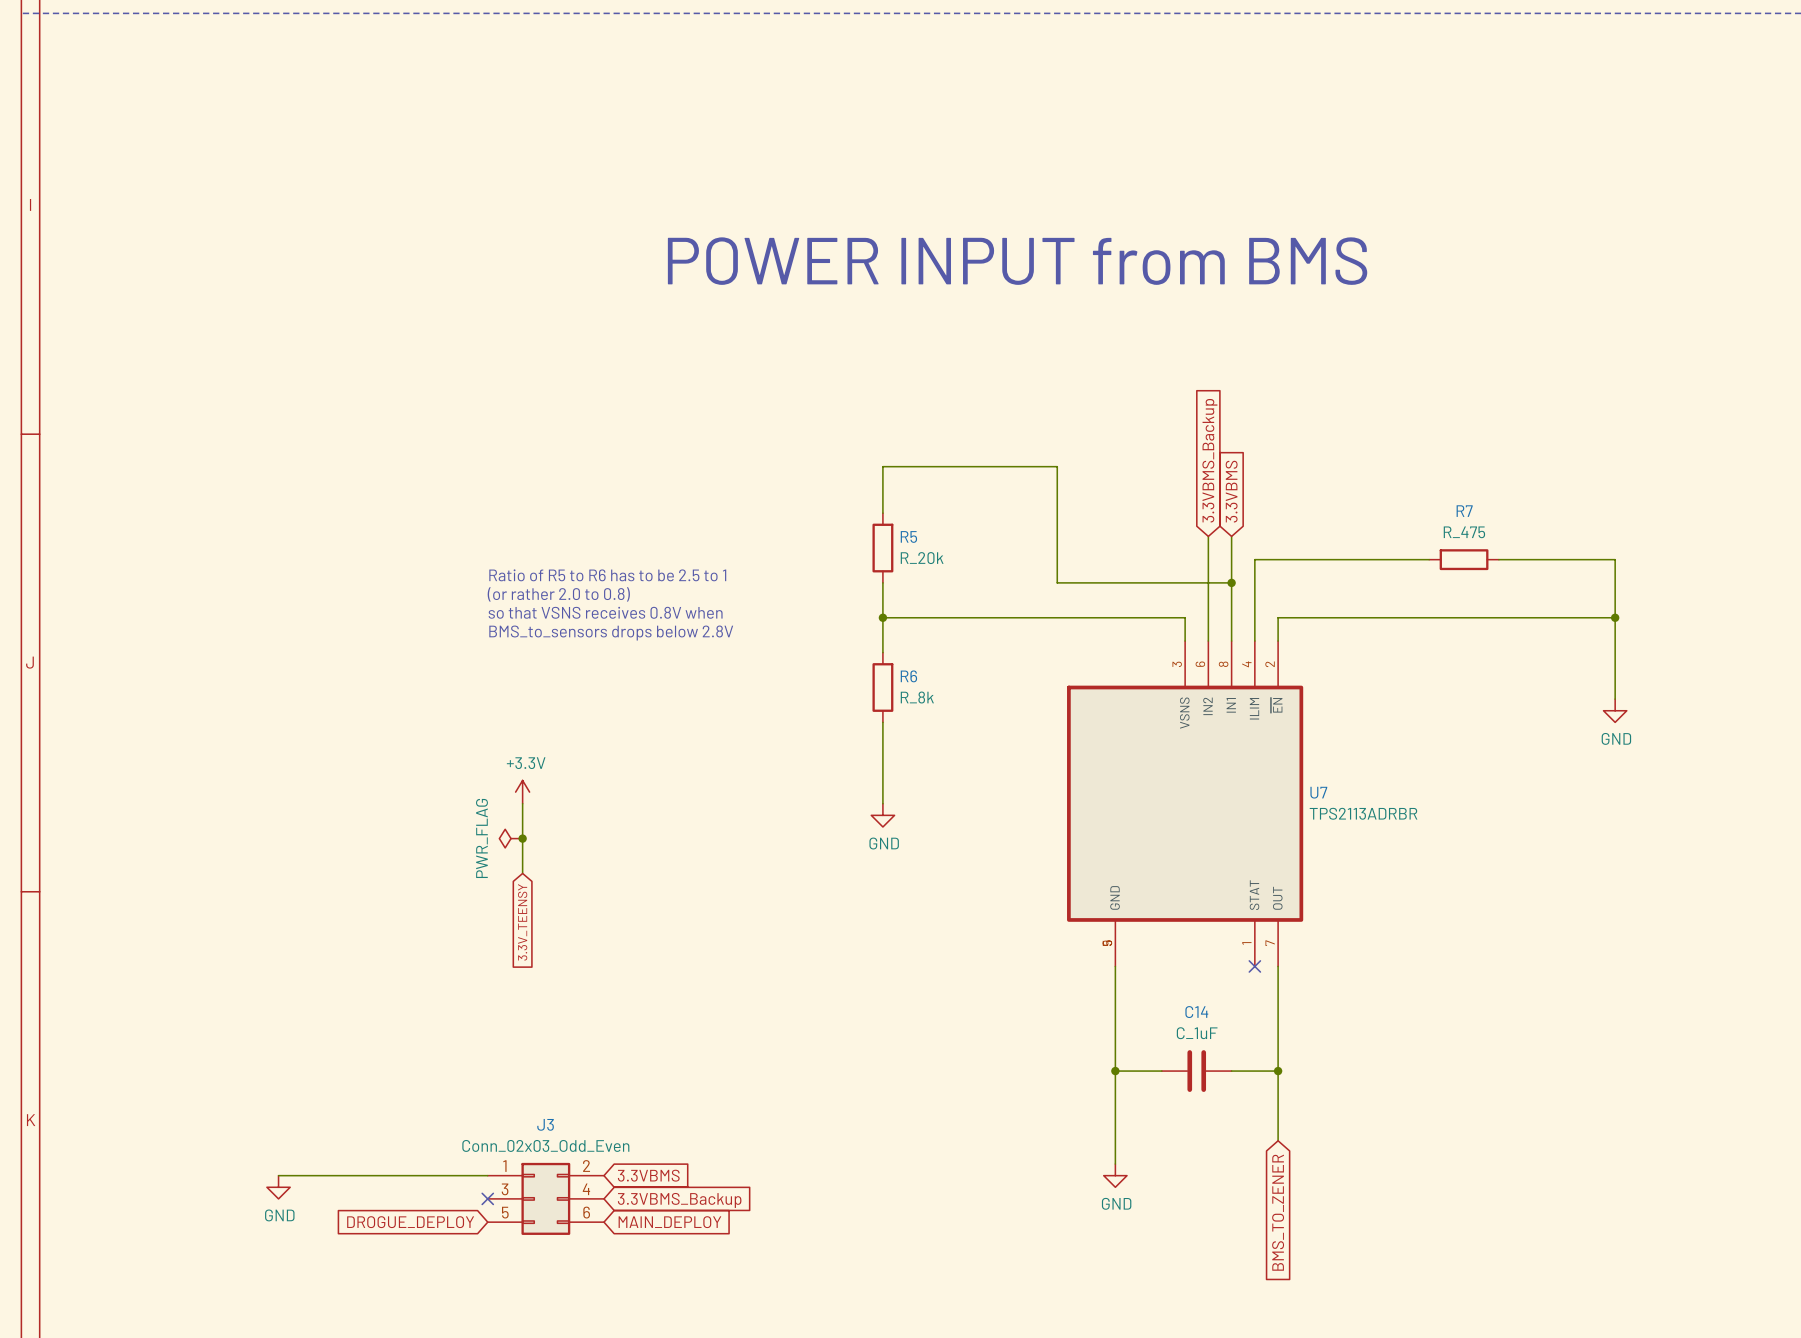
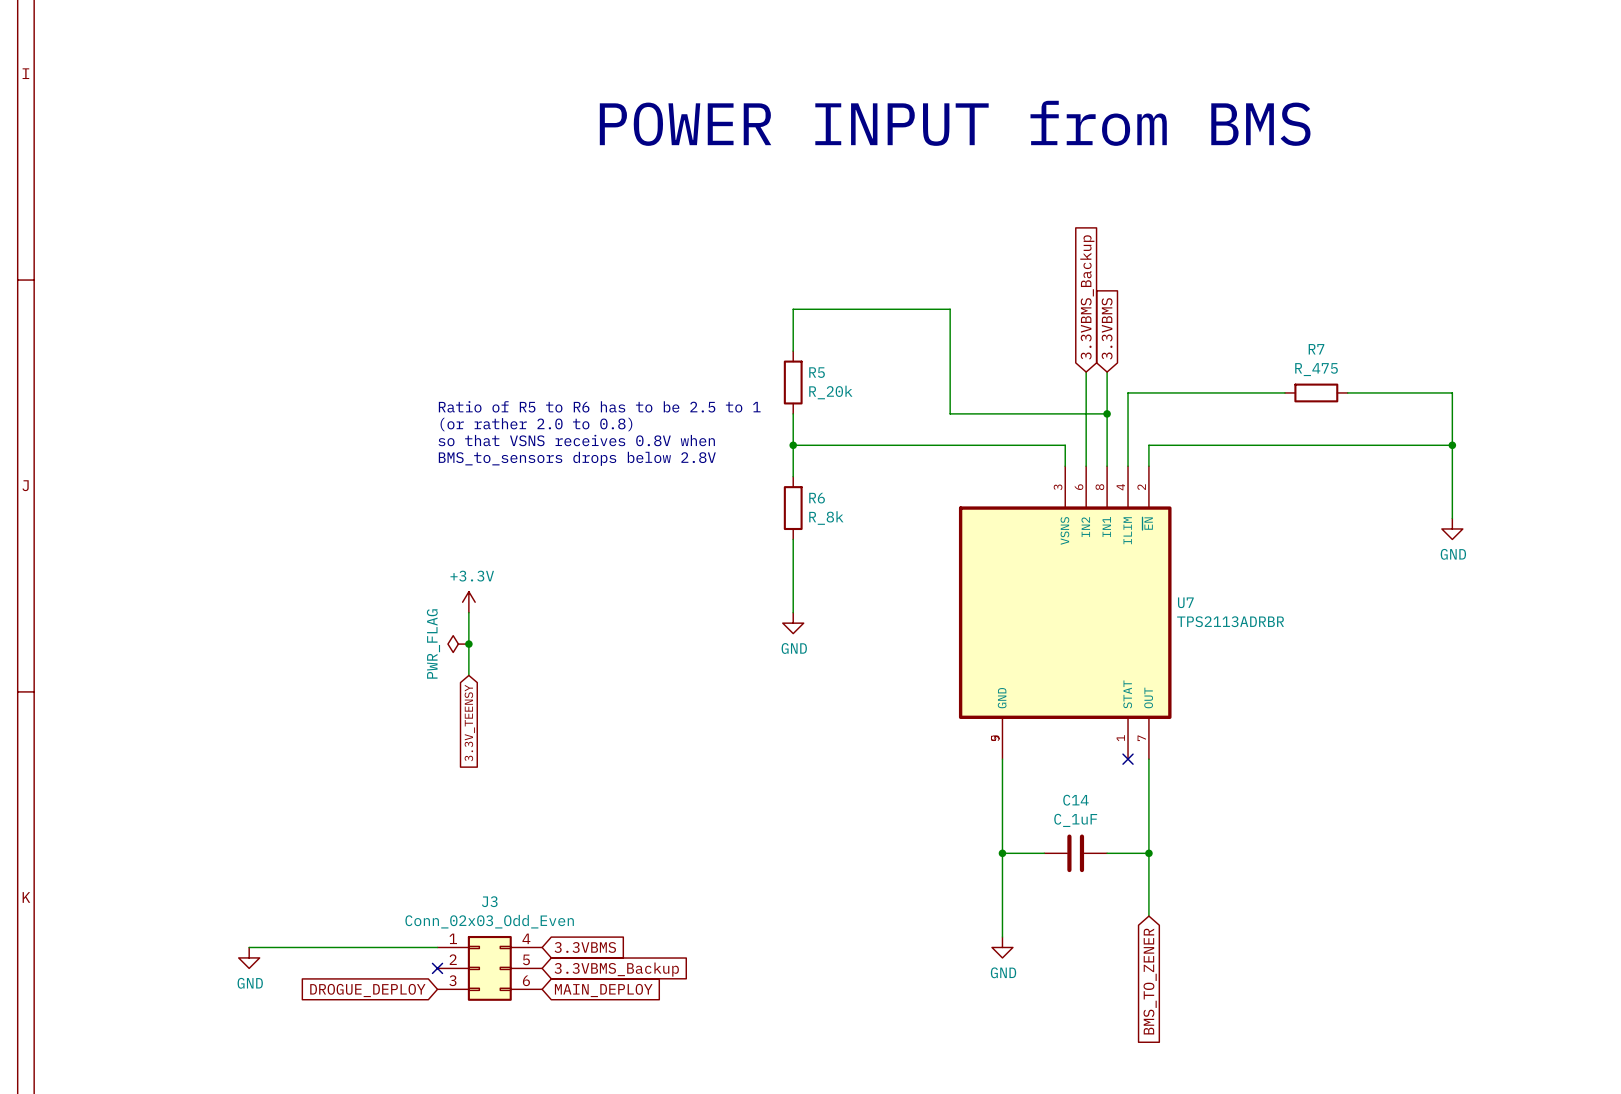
J3 pin number: 2 (586, 1166) -> 4 (526, 938)
J3 pin number: 3 (505, 1189) -> 2 (453, 959)
J3 pin number: 4 (586, 1189) -> 5 (526, 959)
J3 pin number: 5 (505, 1212) -> 3 (452, 980)

